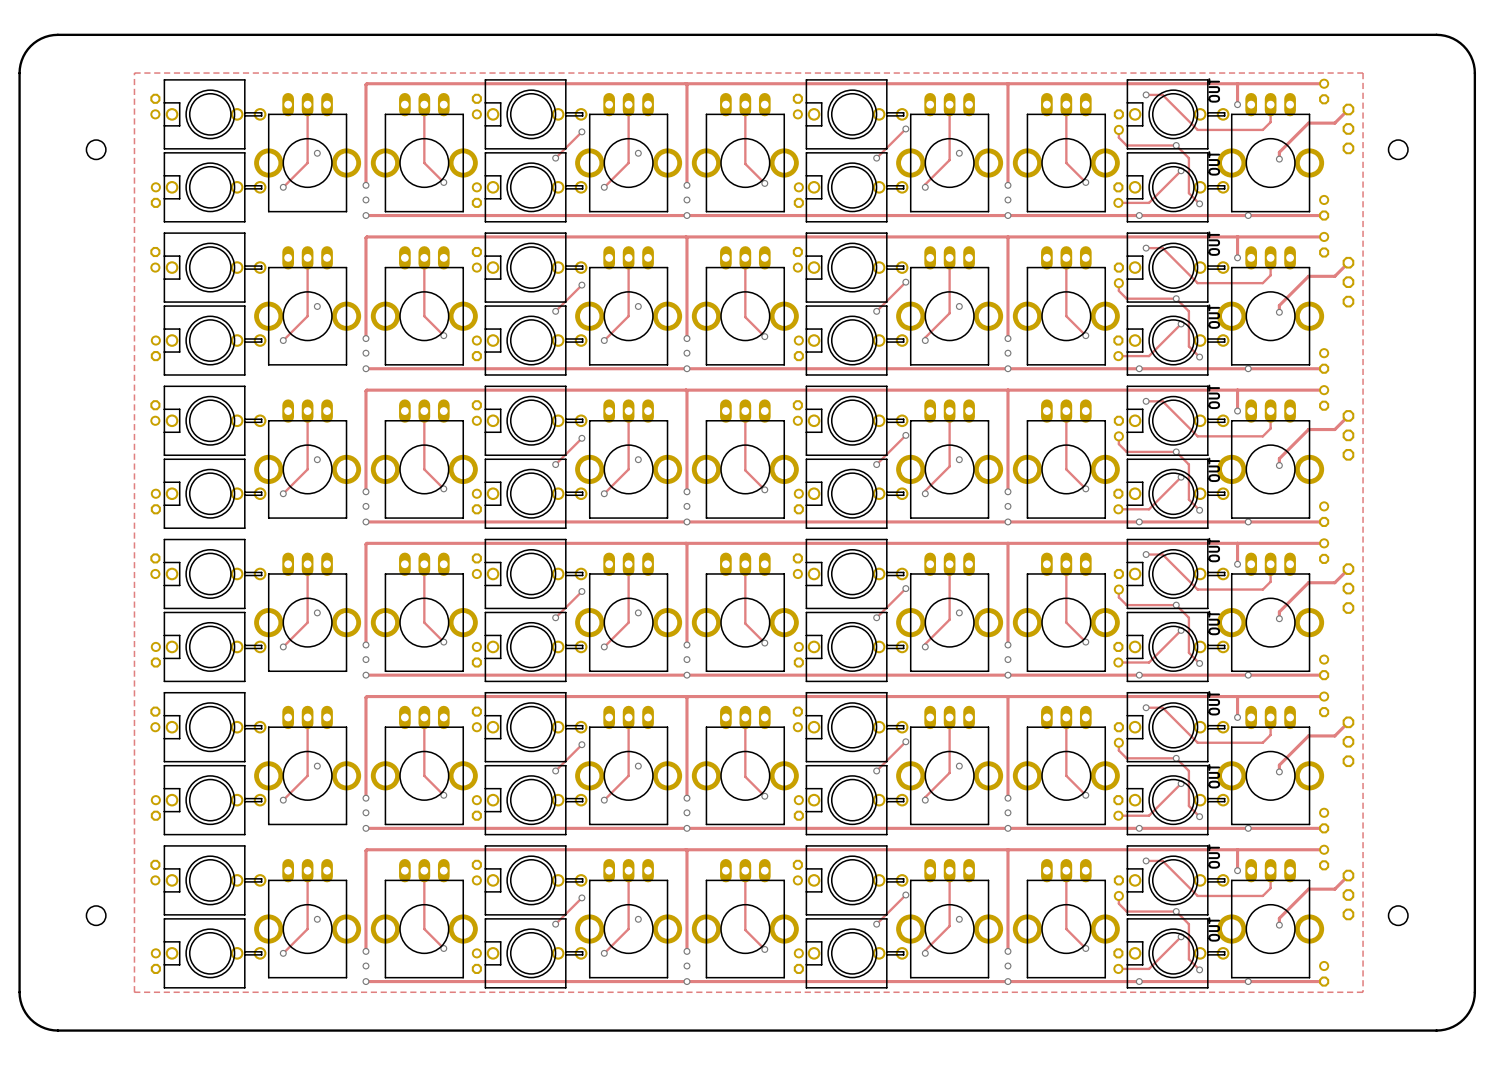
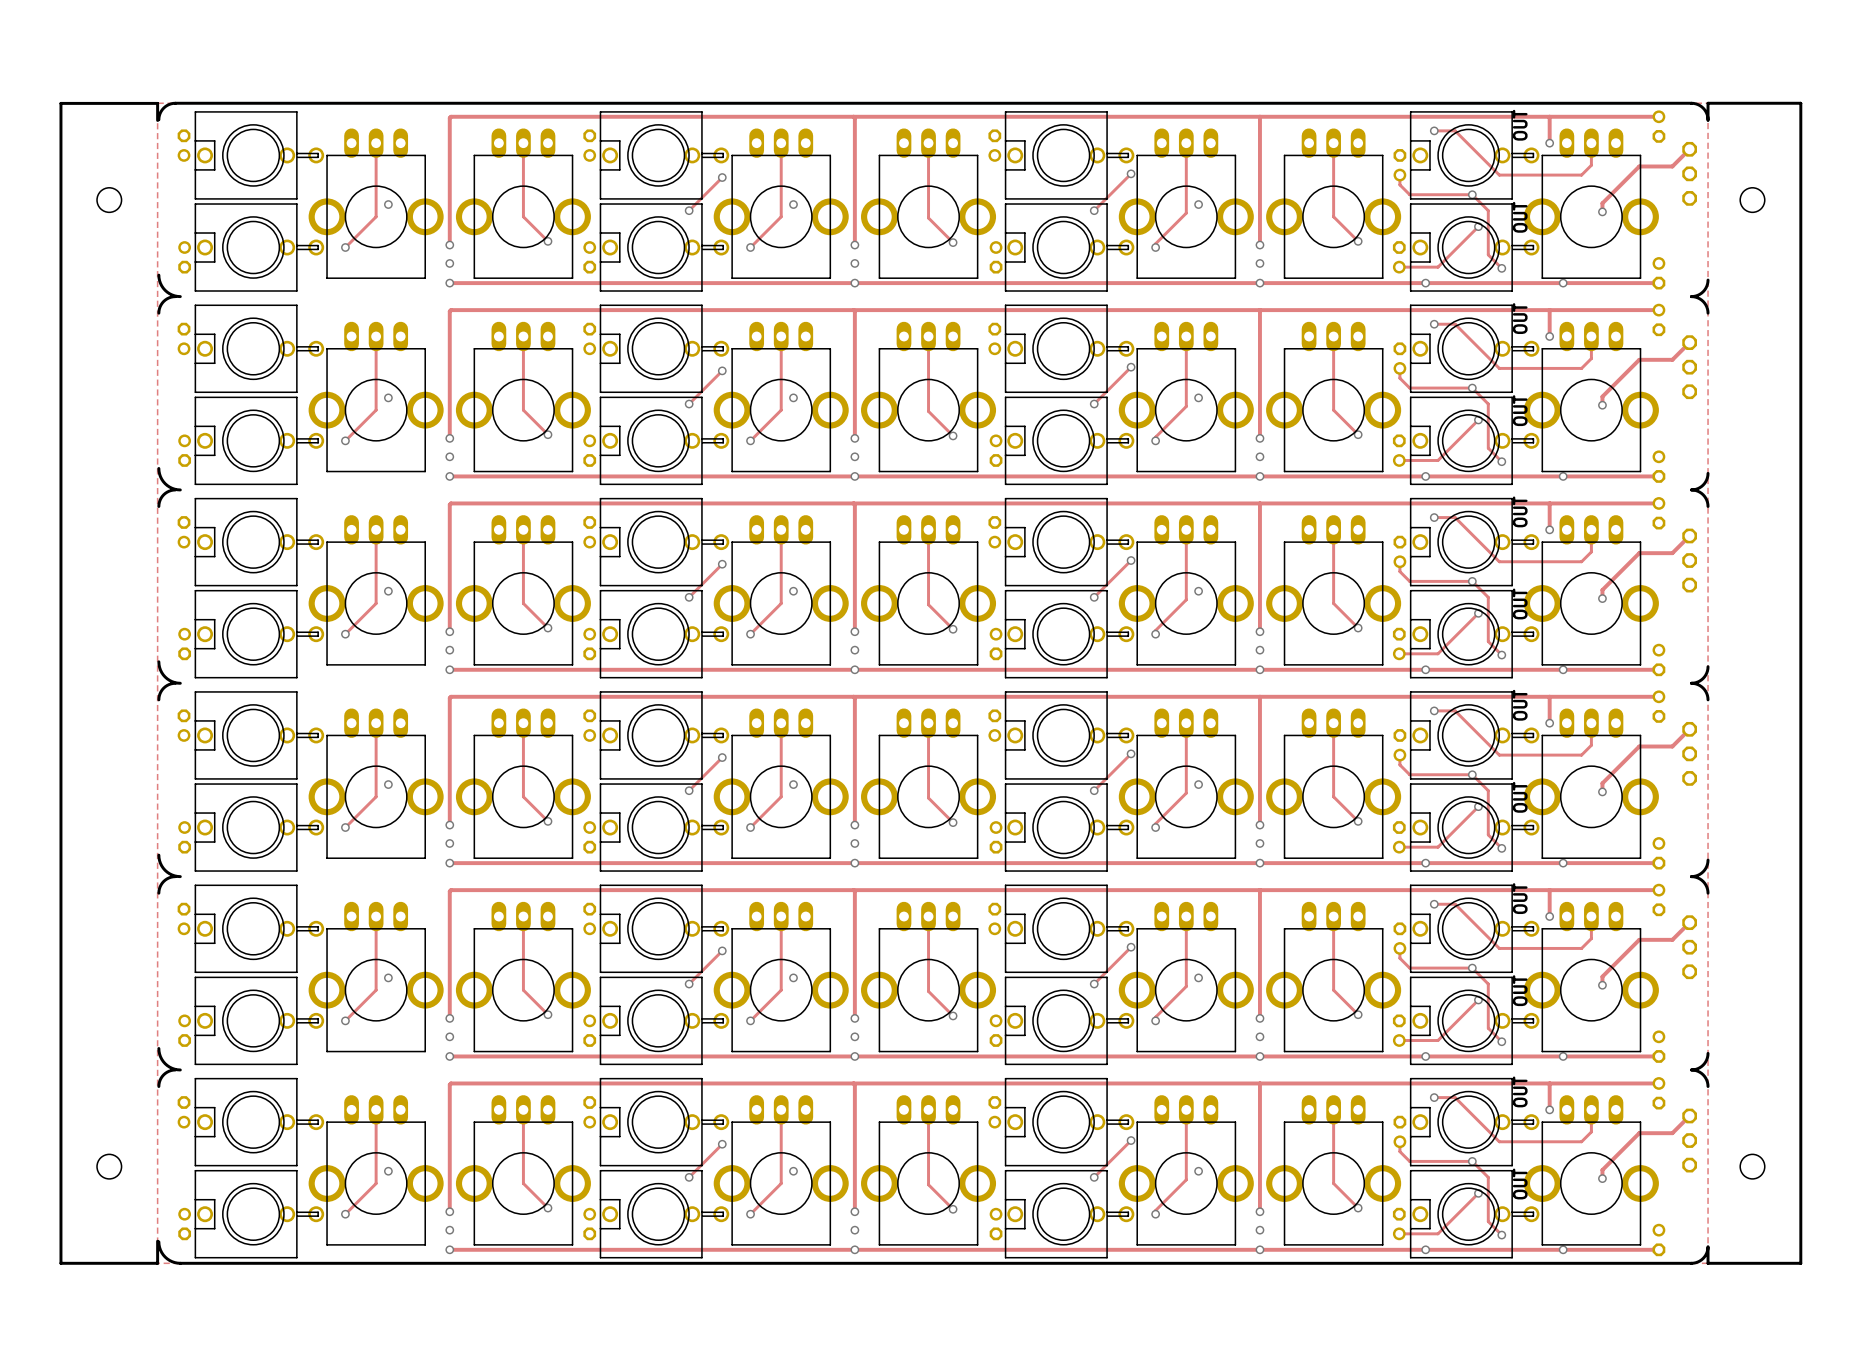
board edge: (57, 34) (1436, 34) (1456, 40) (1468, 52) (1474, 73) (1474, 992) (1468, 1012) (1456, 1024) (1436, 1030) (57, 1030) (37, 1024) (25, 1012) (19, 992) (19, 73) (21, 60) (30, 46) (45, 36) (57, 34) -> none
board edge: none -> (157, 120) (157, 103) (60, 103) (60, 1263) (157, 1263) (157, 1241)
board edge: none -> (158, 119) (163, 108) (175, 103) (1691, 103) (1703, 108) (1708, 119)
board edge: none -> (1708, 120) (1708, 103) (1800, 103) (1800, 1263) (1708, 1263) (1708, 1247)
board edge: none -> (158, 275) (160, 283) (165, 290) (172, 294) (180, 296)
board edge: none -> (1708, 280) (1703, 291) (1691, 296) (1703, 301) (1708, 313)
board edge: none -> (175, 296) (163, 301) (158, 313)
board edge: none -> (158, 468) (160, 476) (165, 483) (172, 488) (180, 489)
board edge: none -> (1708, 473) (1703, 485) (1691, 489) (1703, 494) (1708, 506)
board edge: none -> (175, 489) (163, 494) (158, 506)
board edge: none -> (158, 661) (160, 670) (165, 676) (172, 681) (180, 683)
board edge: none -> (1708, 666) (1703, 678) (1691, 683) (1703, 688) (1708, 699)
board edge: none -> (175, 683) (163, 688) (158, 699)
board edge: none -> (158, 855) (160, 863) (165, 870) (172, 874) (180, 876)
board edge: none -> (1708, 860) (1703, 871) (1691, 876) (1703, 881) (1708, 893)
board edge: none -> (175, 876) (163, 881) (158, 893)
board edge: none -> (158, 1048) (160, 1056) (165, 1063) (172, 1068) (180, 1069)
board edge: none -> (1708, 1053) (1703, 1065) (1691, 1069) (1703, 1074) (1708, 1086)
board edge: none -> (175, 1069) (163, 1074) (158, 1086)
board edge: none -> (158, 1241) (160, 1250) (165, 1257) (172, 1261) (180, 1263) (1691, 1263) (1703, 1258) (1708, 1246)

